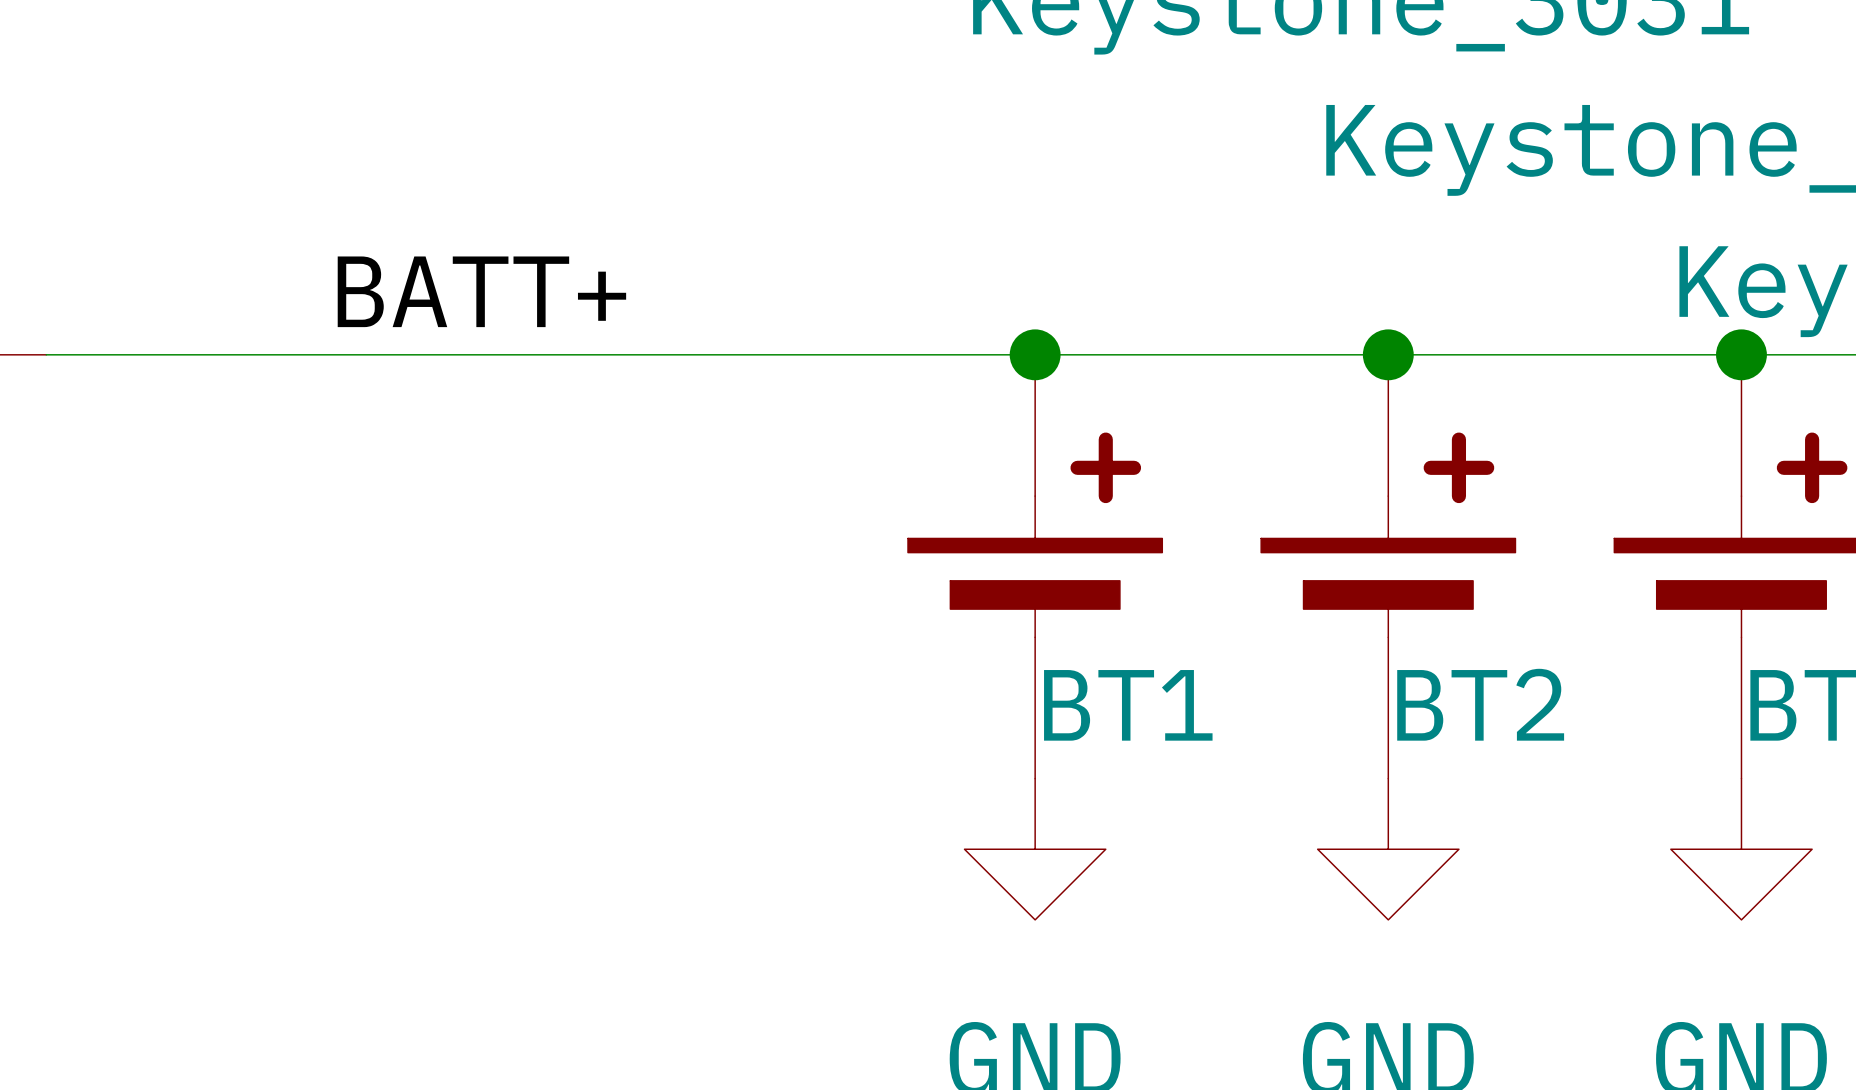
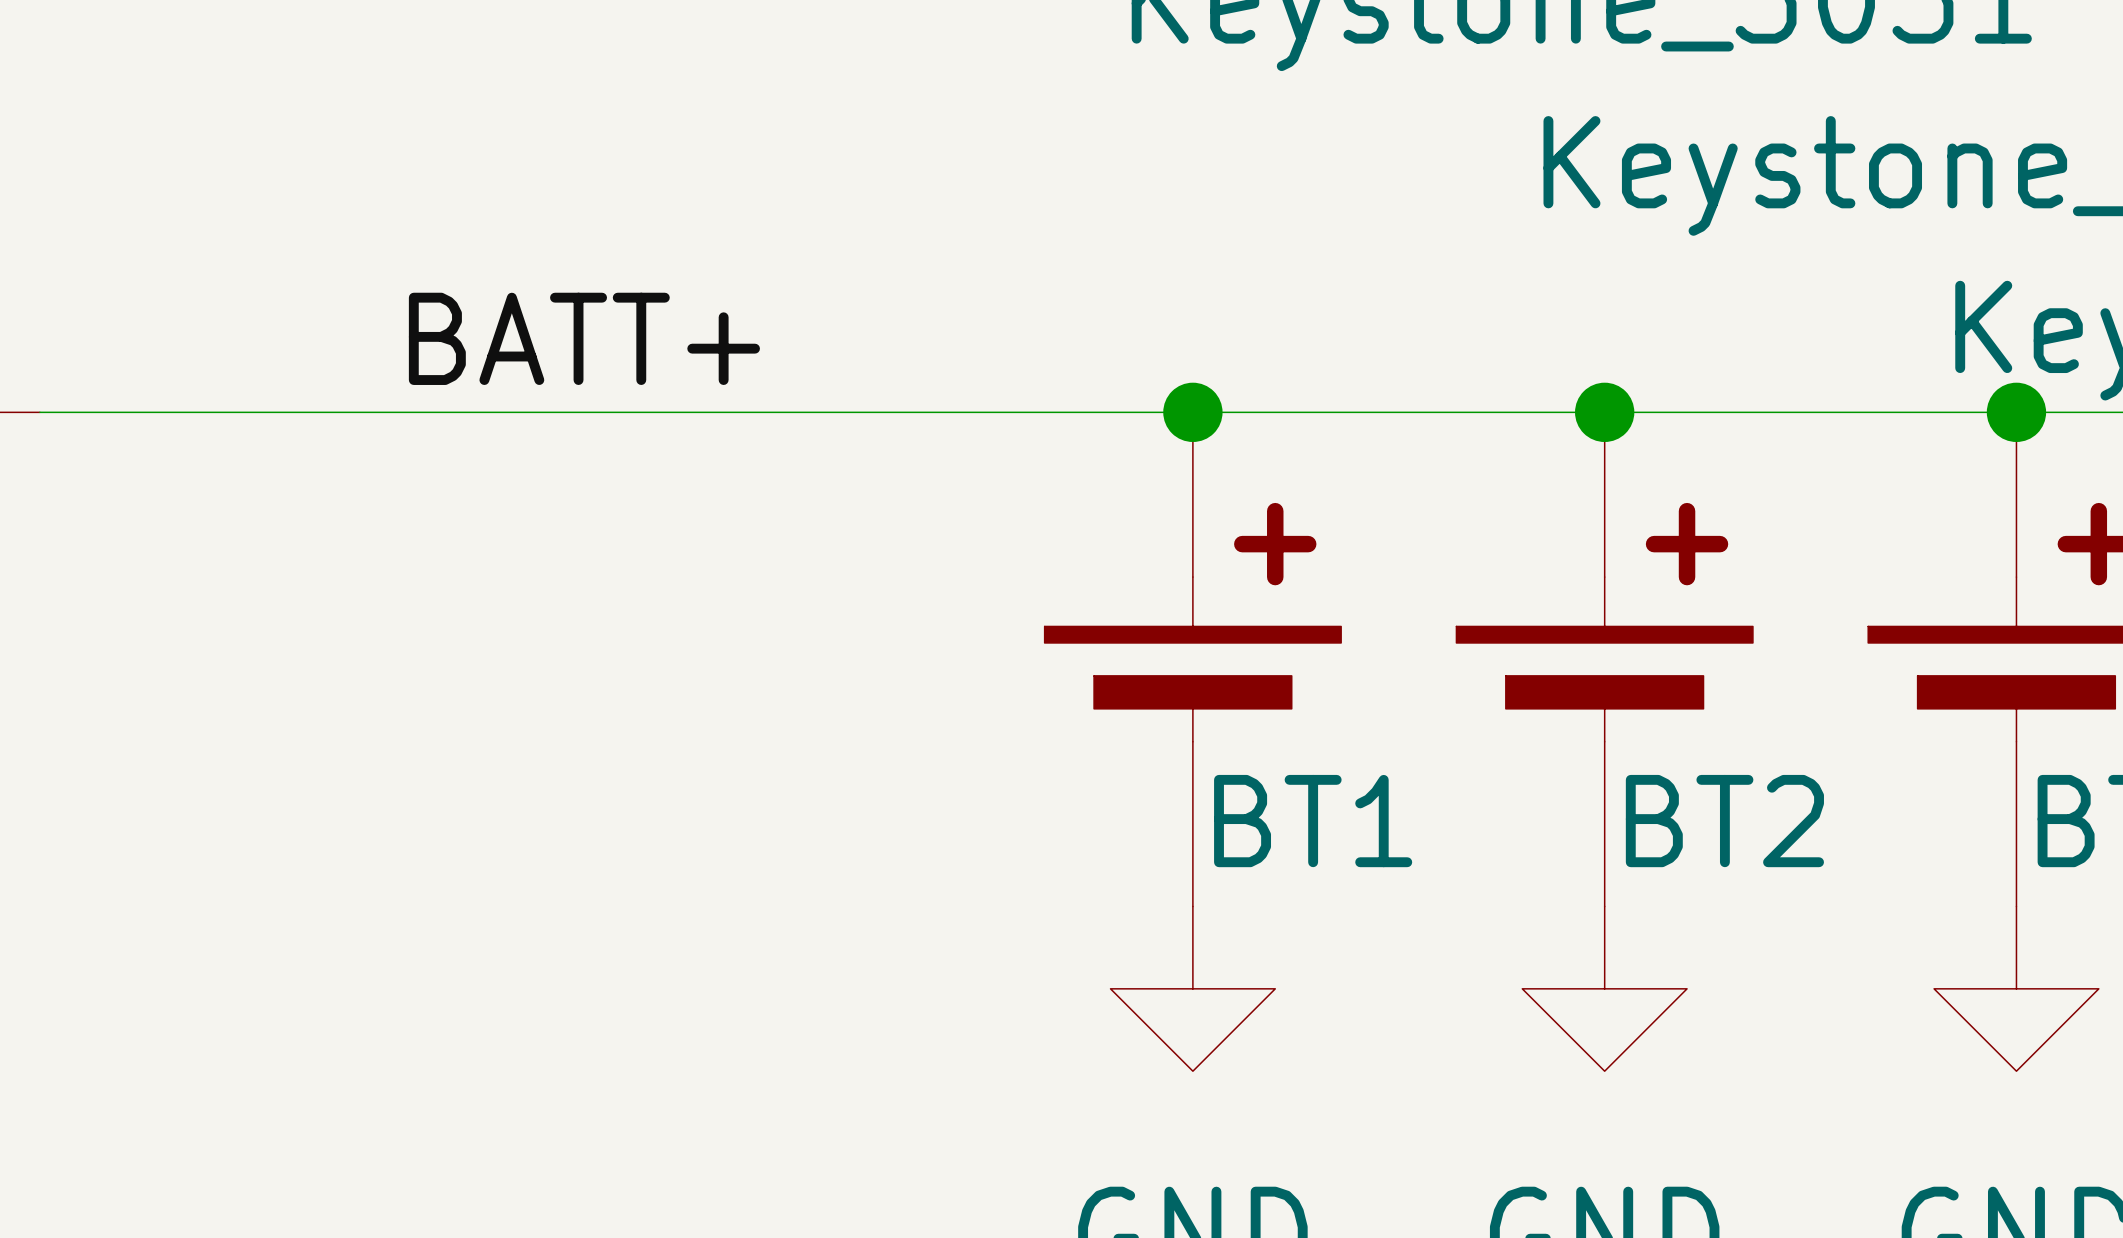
label position: BATT+ (481, 291) -> BATT+ (584, 338)

